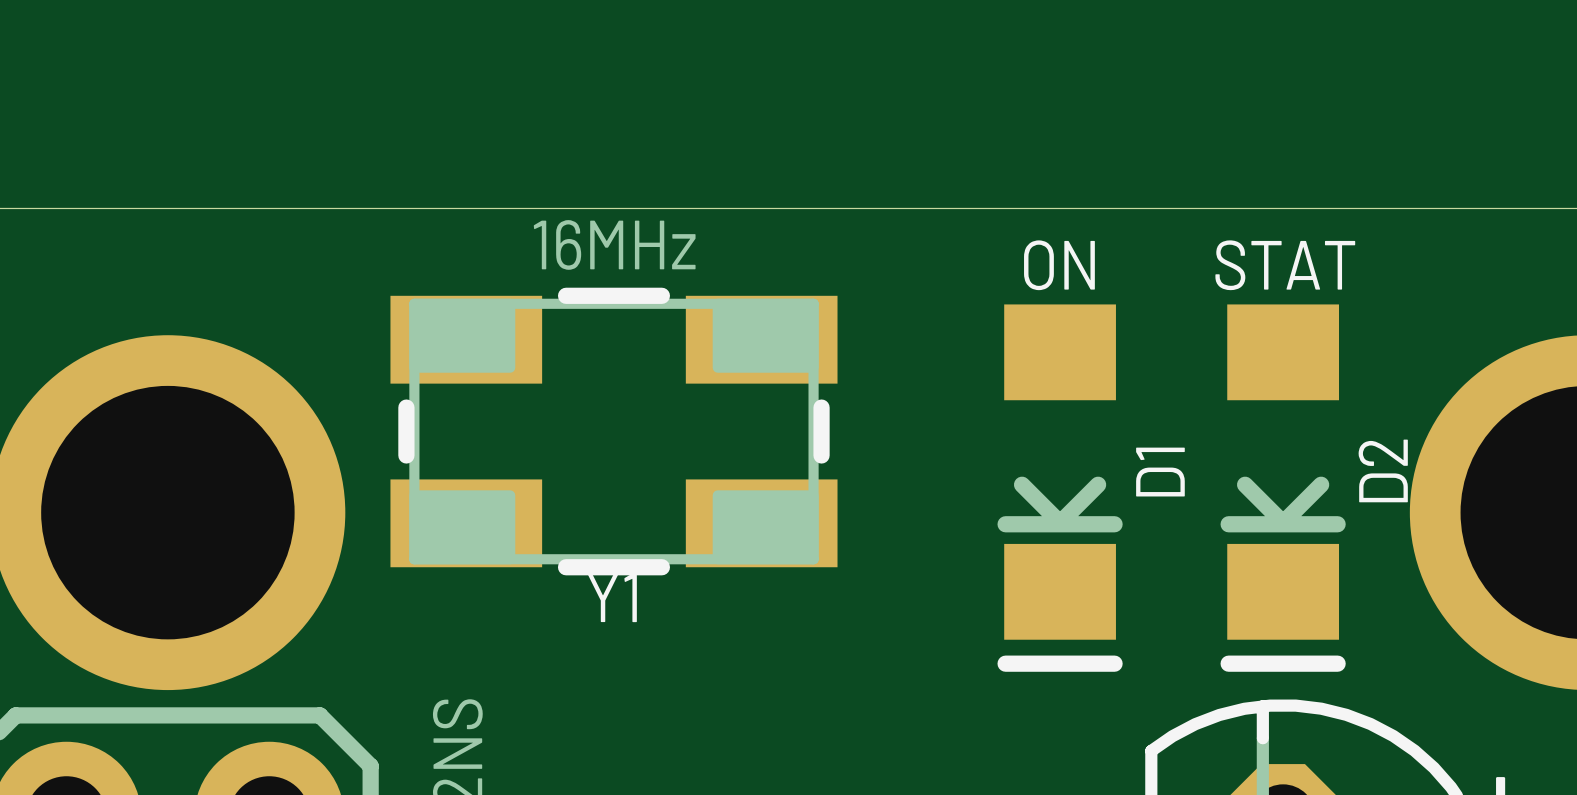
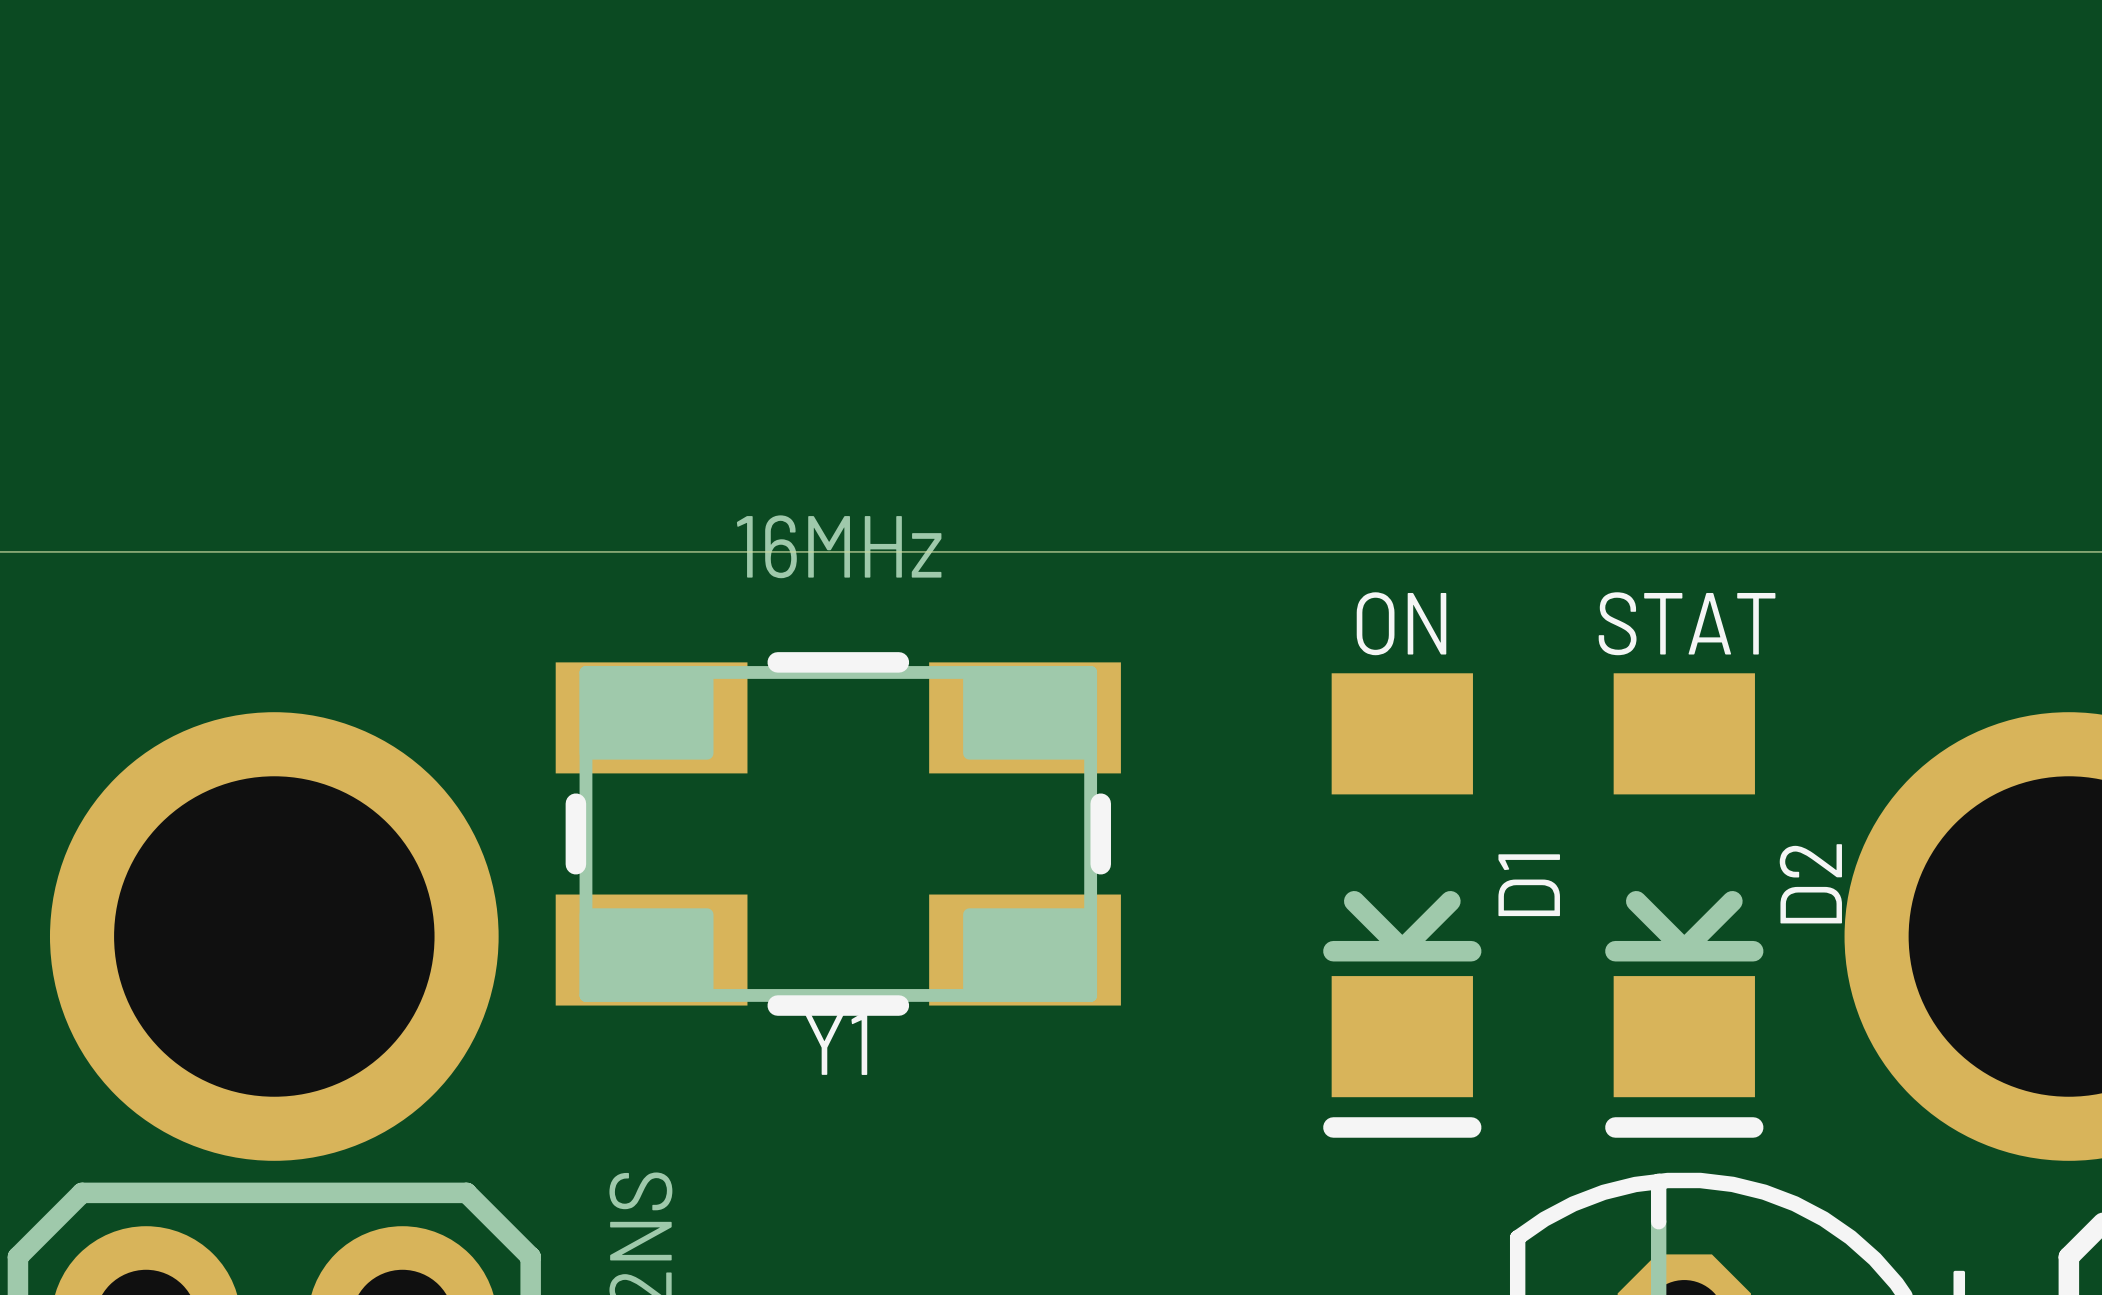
Y1 value position: 16MHz (614, 244) -> 16MHz (839, 546)

